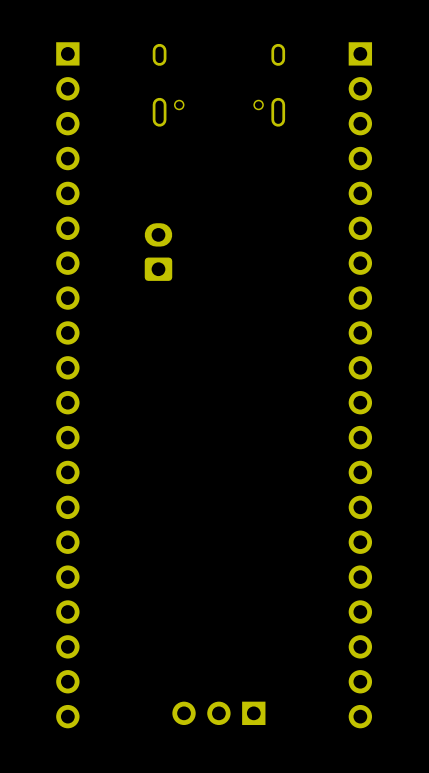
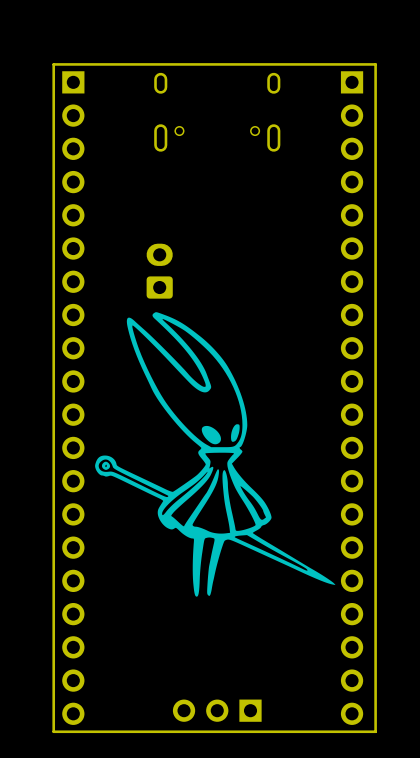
board edge: none -> (375, 64) (53, 64) (53, 731) (375, 731) (375, 64)
drawing: none -> [95, 312, 336, 597]

